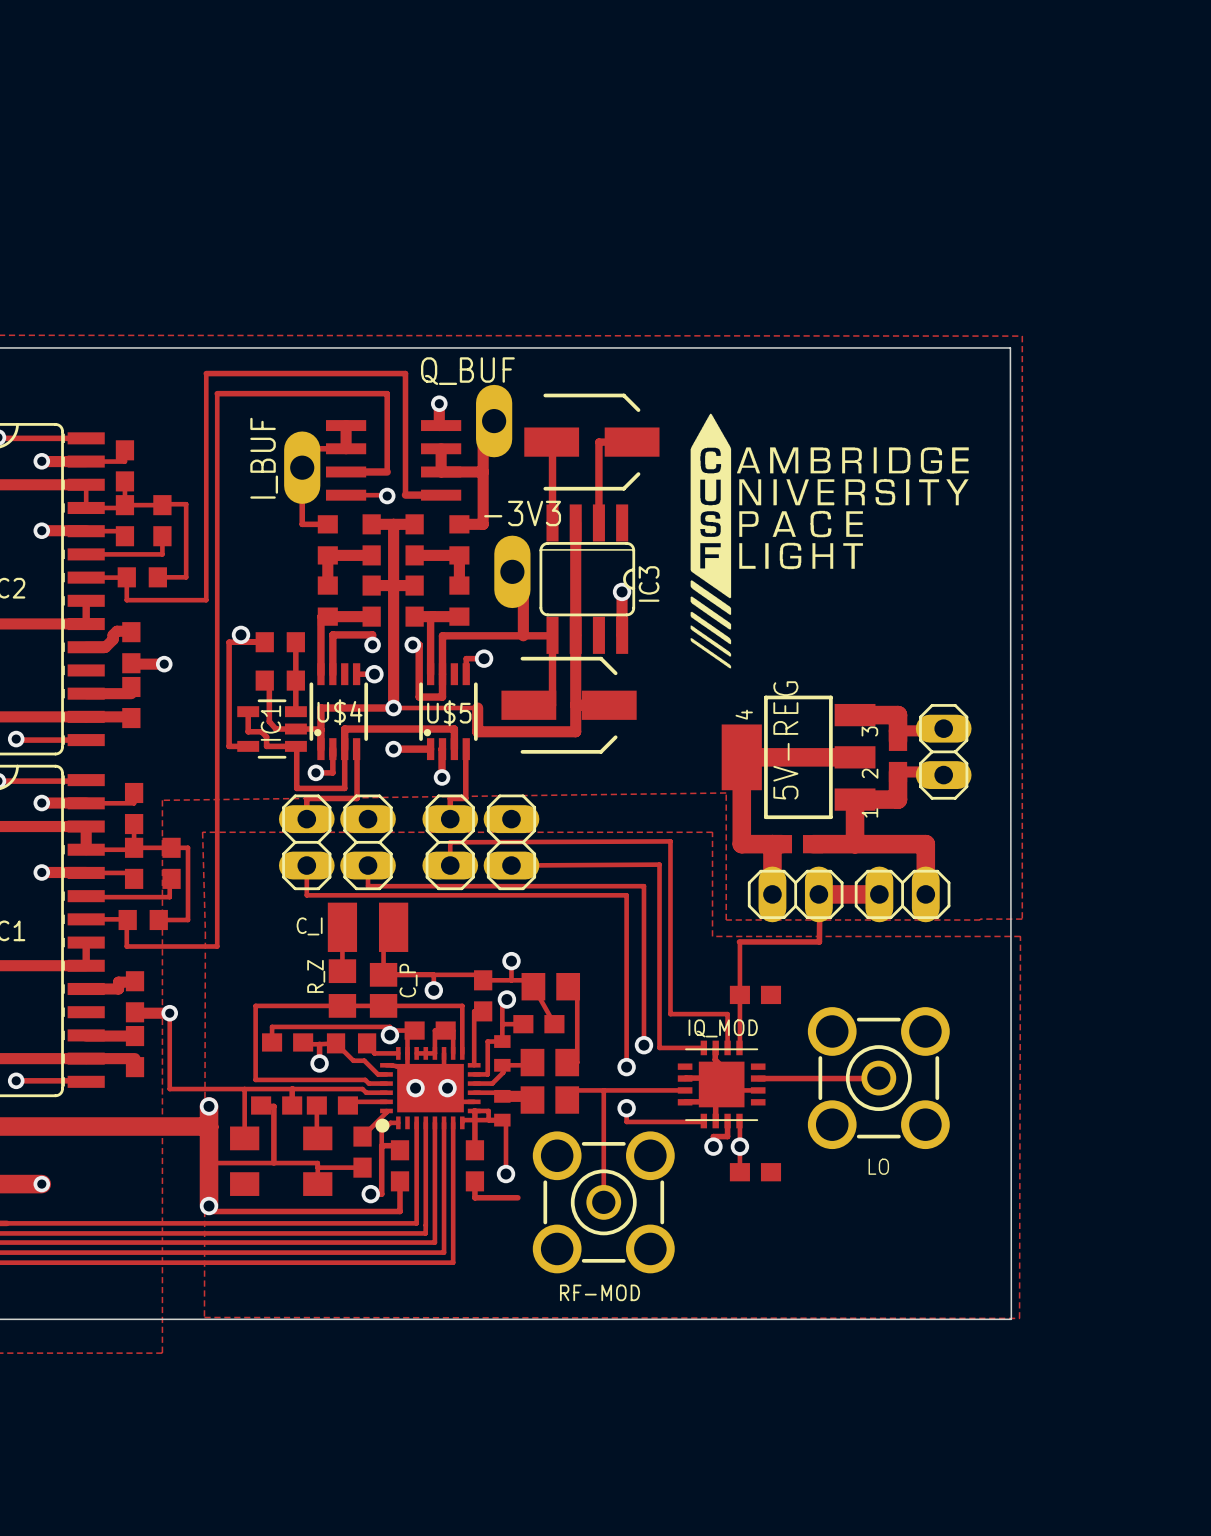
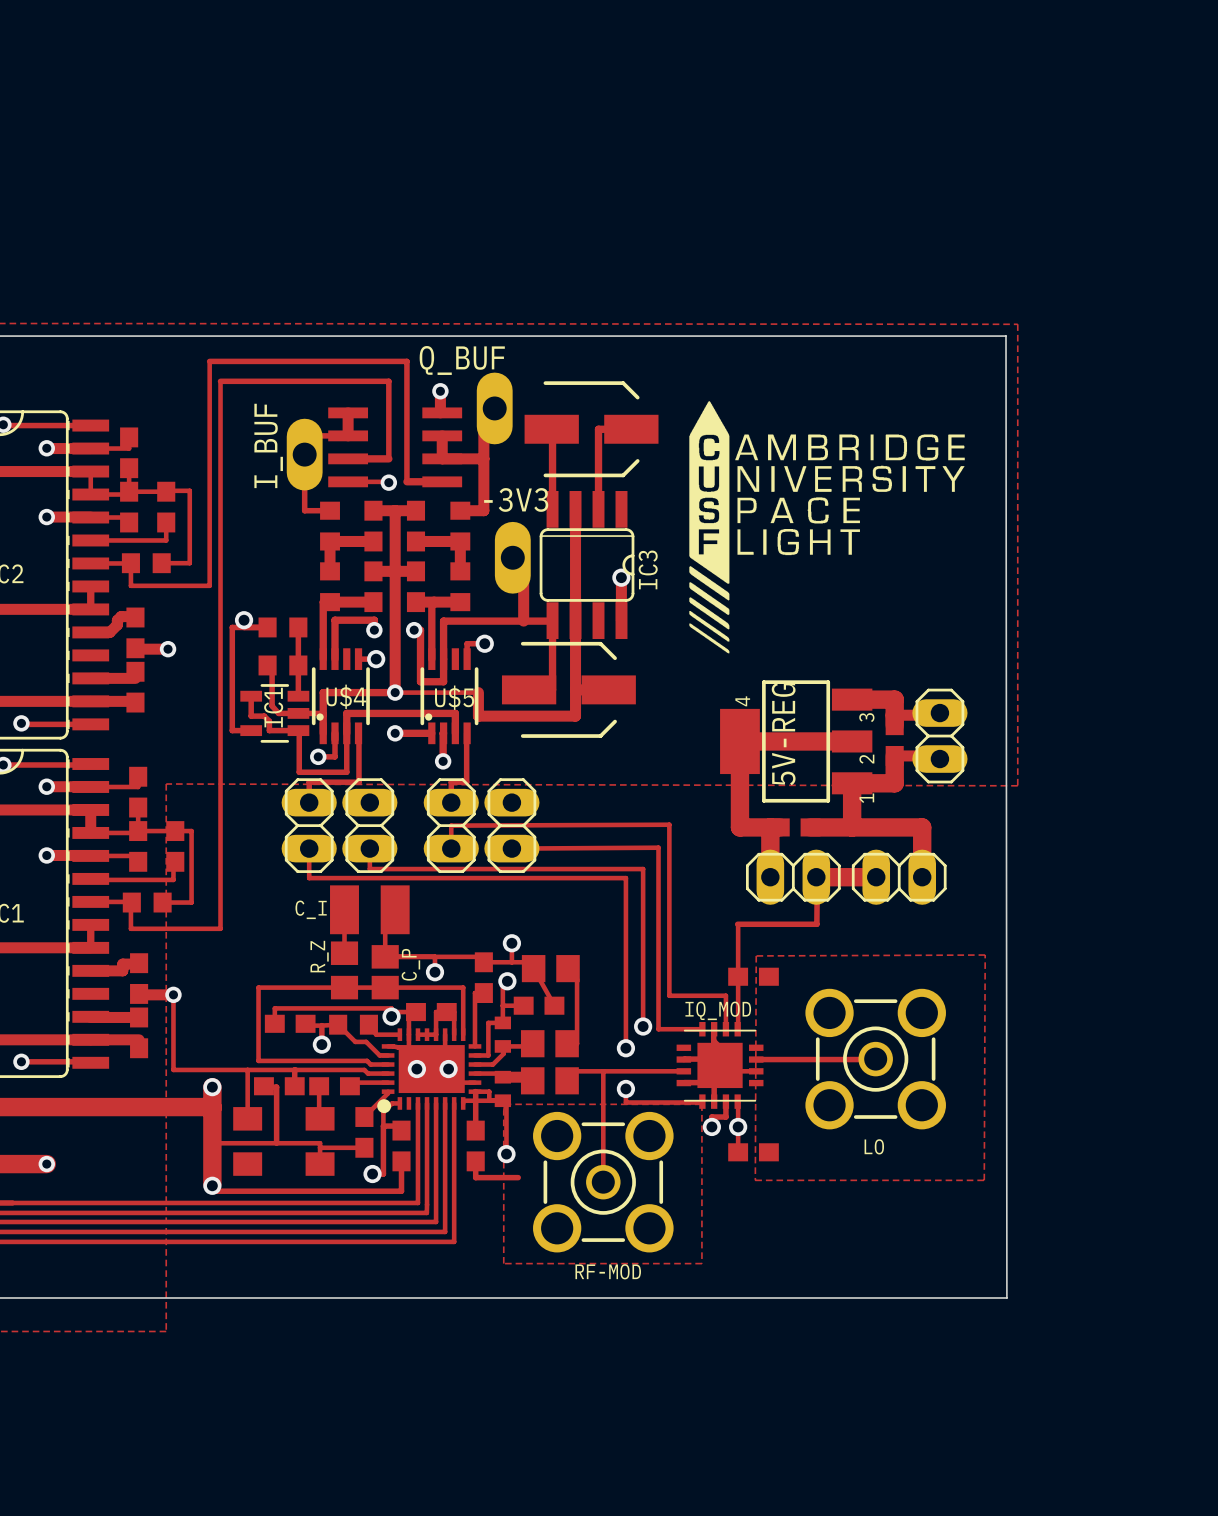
zone outline: (162, 800) (726, 792) (726, 920) (1022, 919) (1022, 802) -> (166, 784) (1017, 785)
zone outline: (202, 832) (712, 832) (712, 936) (1020, 936) (1019, 1318) (204, 1317) (205, 932) (202, 832) -> none
zone outline: none -> (985, 955) (984, 1180) (755, 1180) (756, 955) (985, 955)
zone outline: none -> (504, 1104) (701, 1104) (701, 1263) (503, 1263) (504, 1104)

